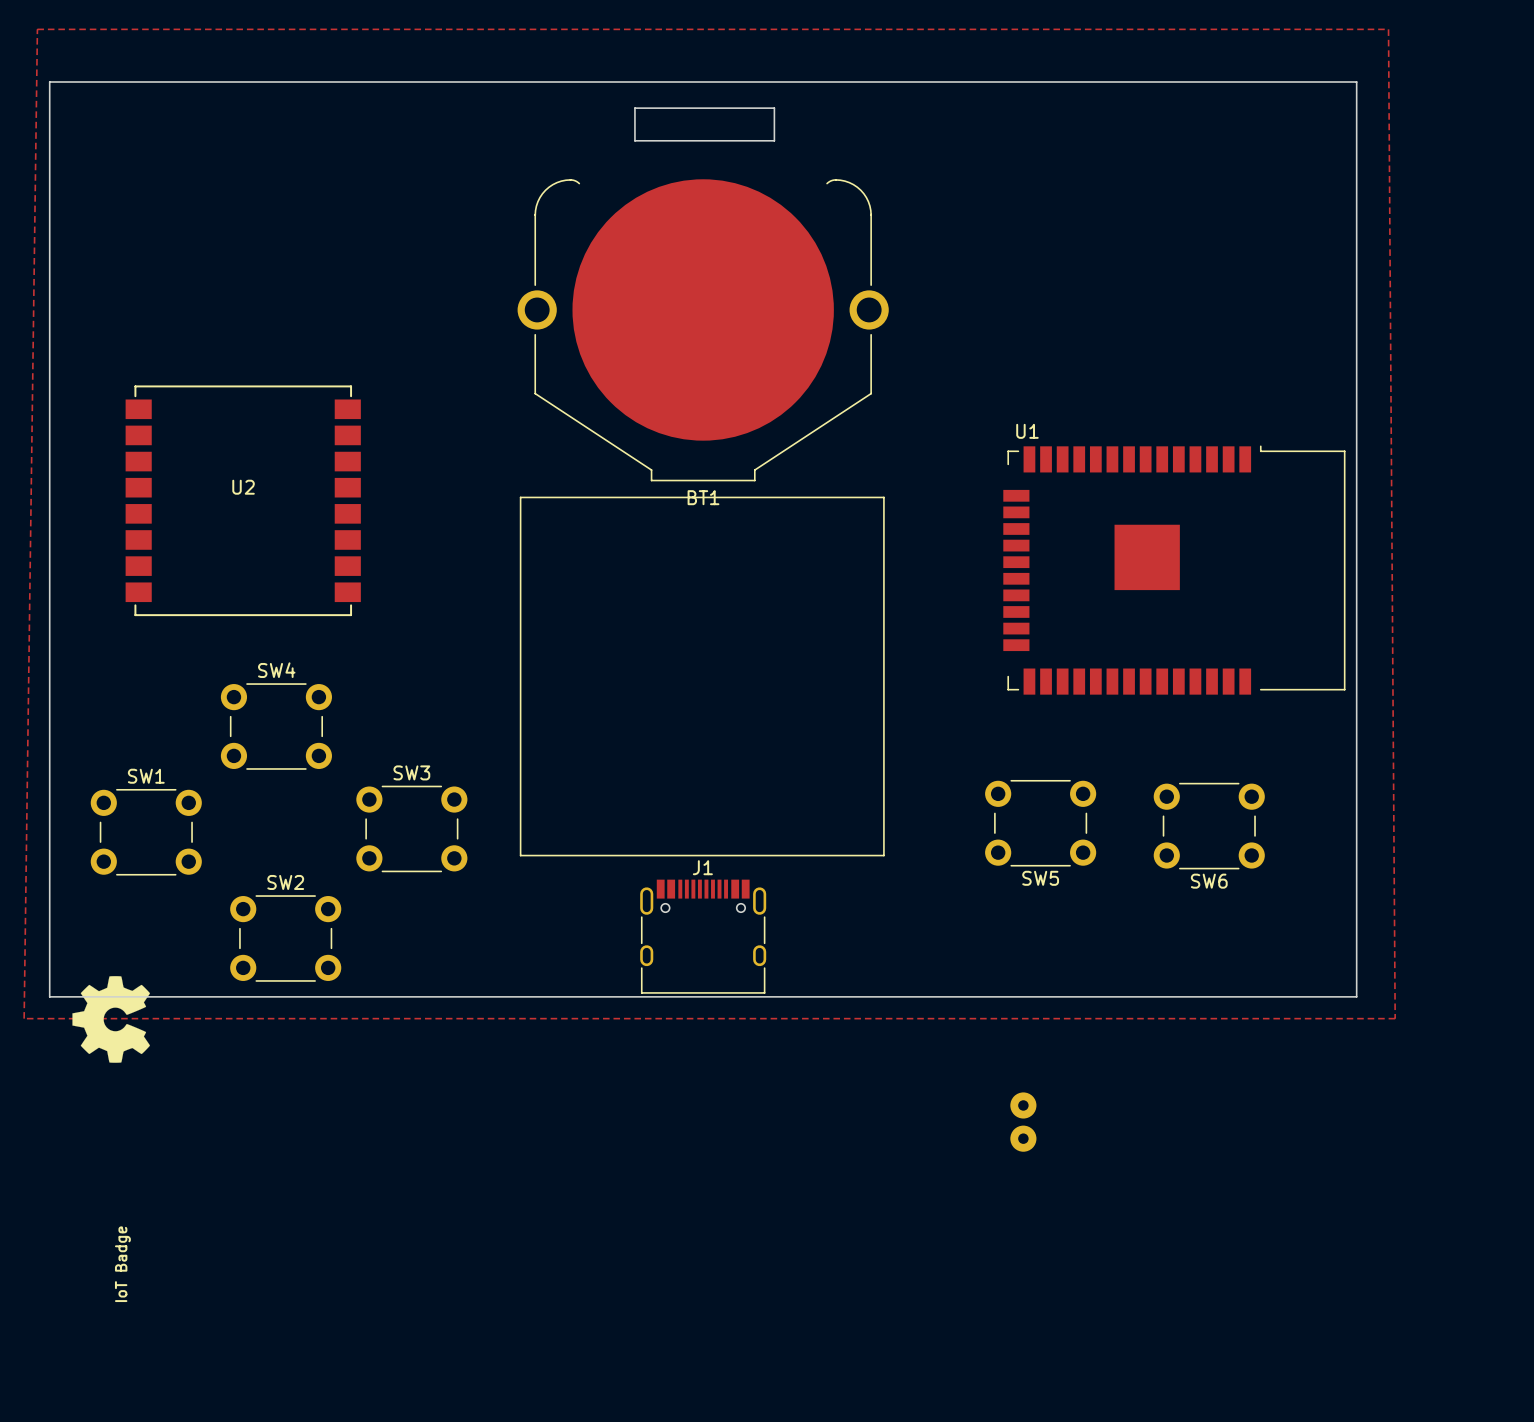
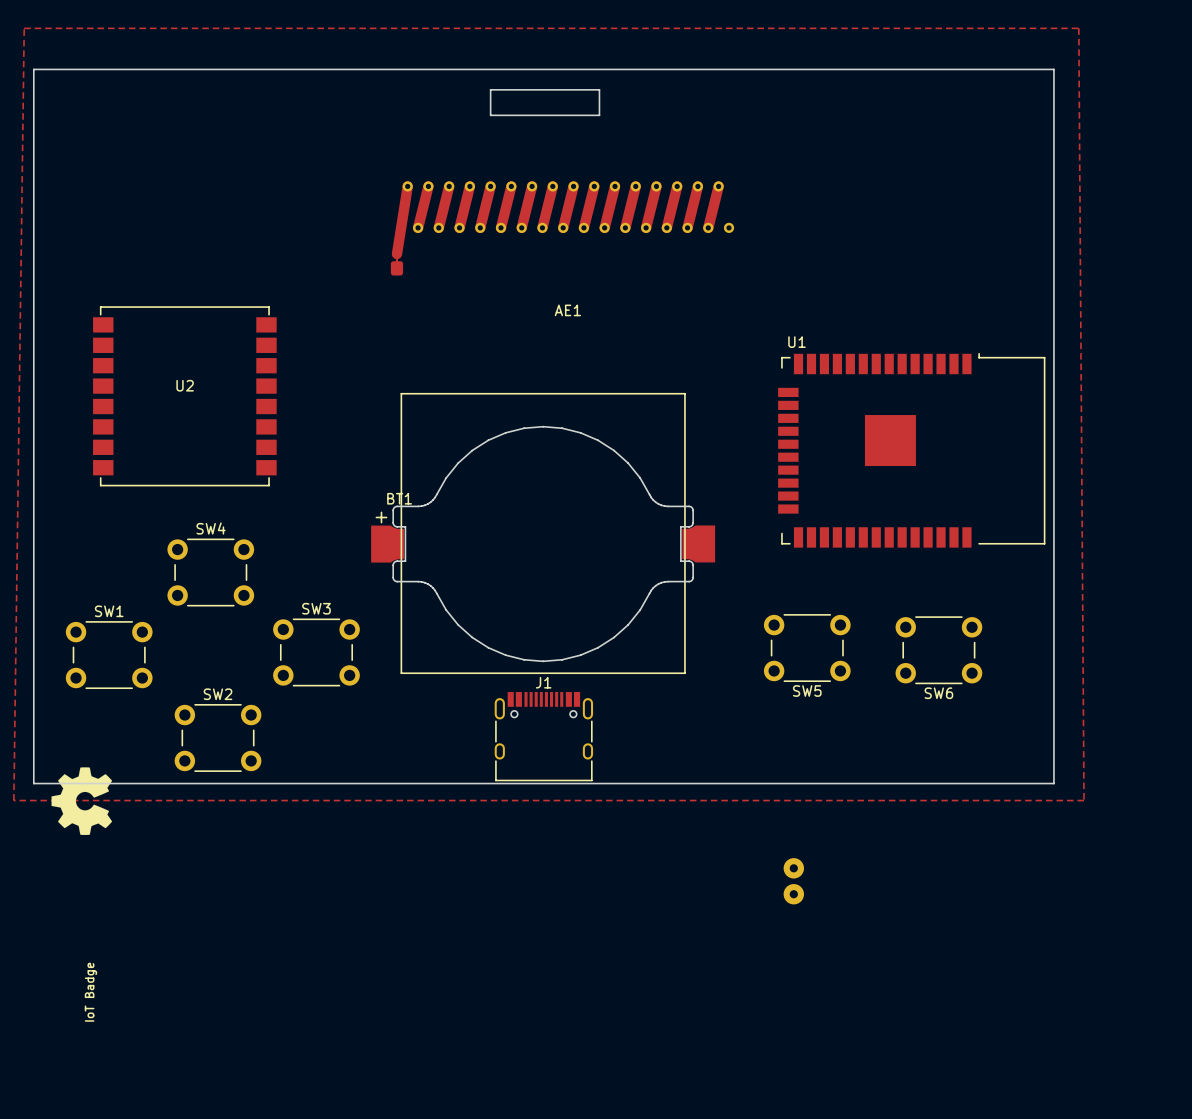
BT1 footprint: [517, 179, 889, 482] -> [371, 426, 716, 662]
AE1: none -> (562, 228)
BT1 name position: BT1 (703, 497) -> BT1 (399, 498)

